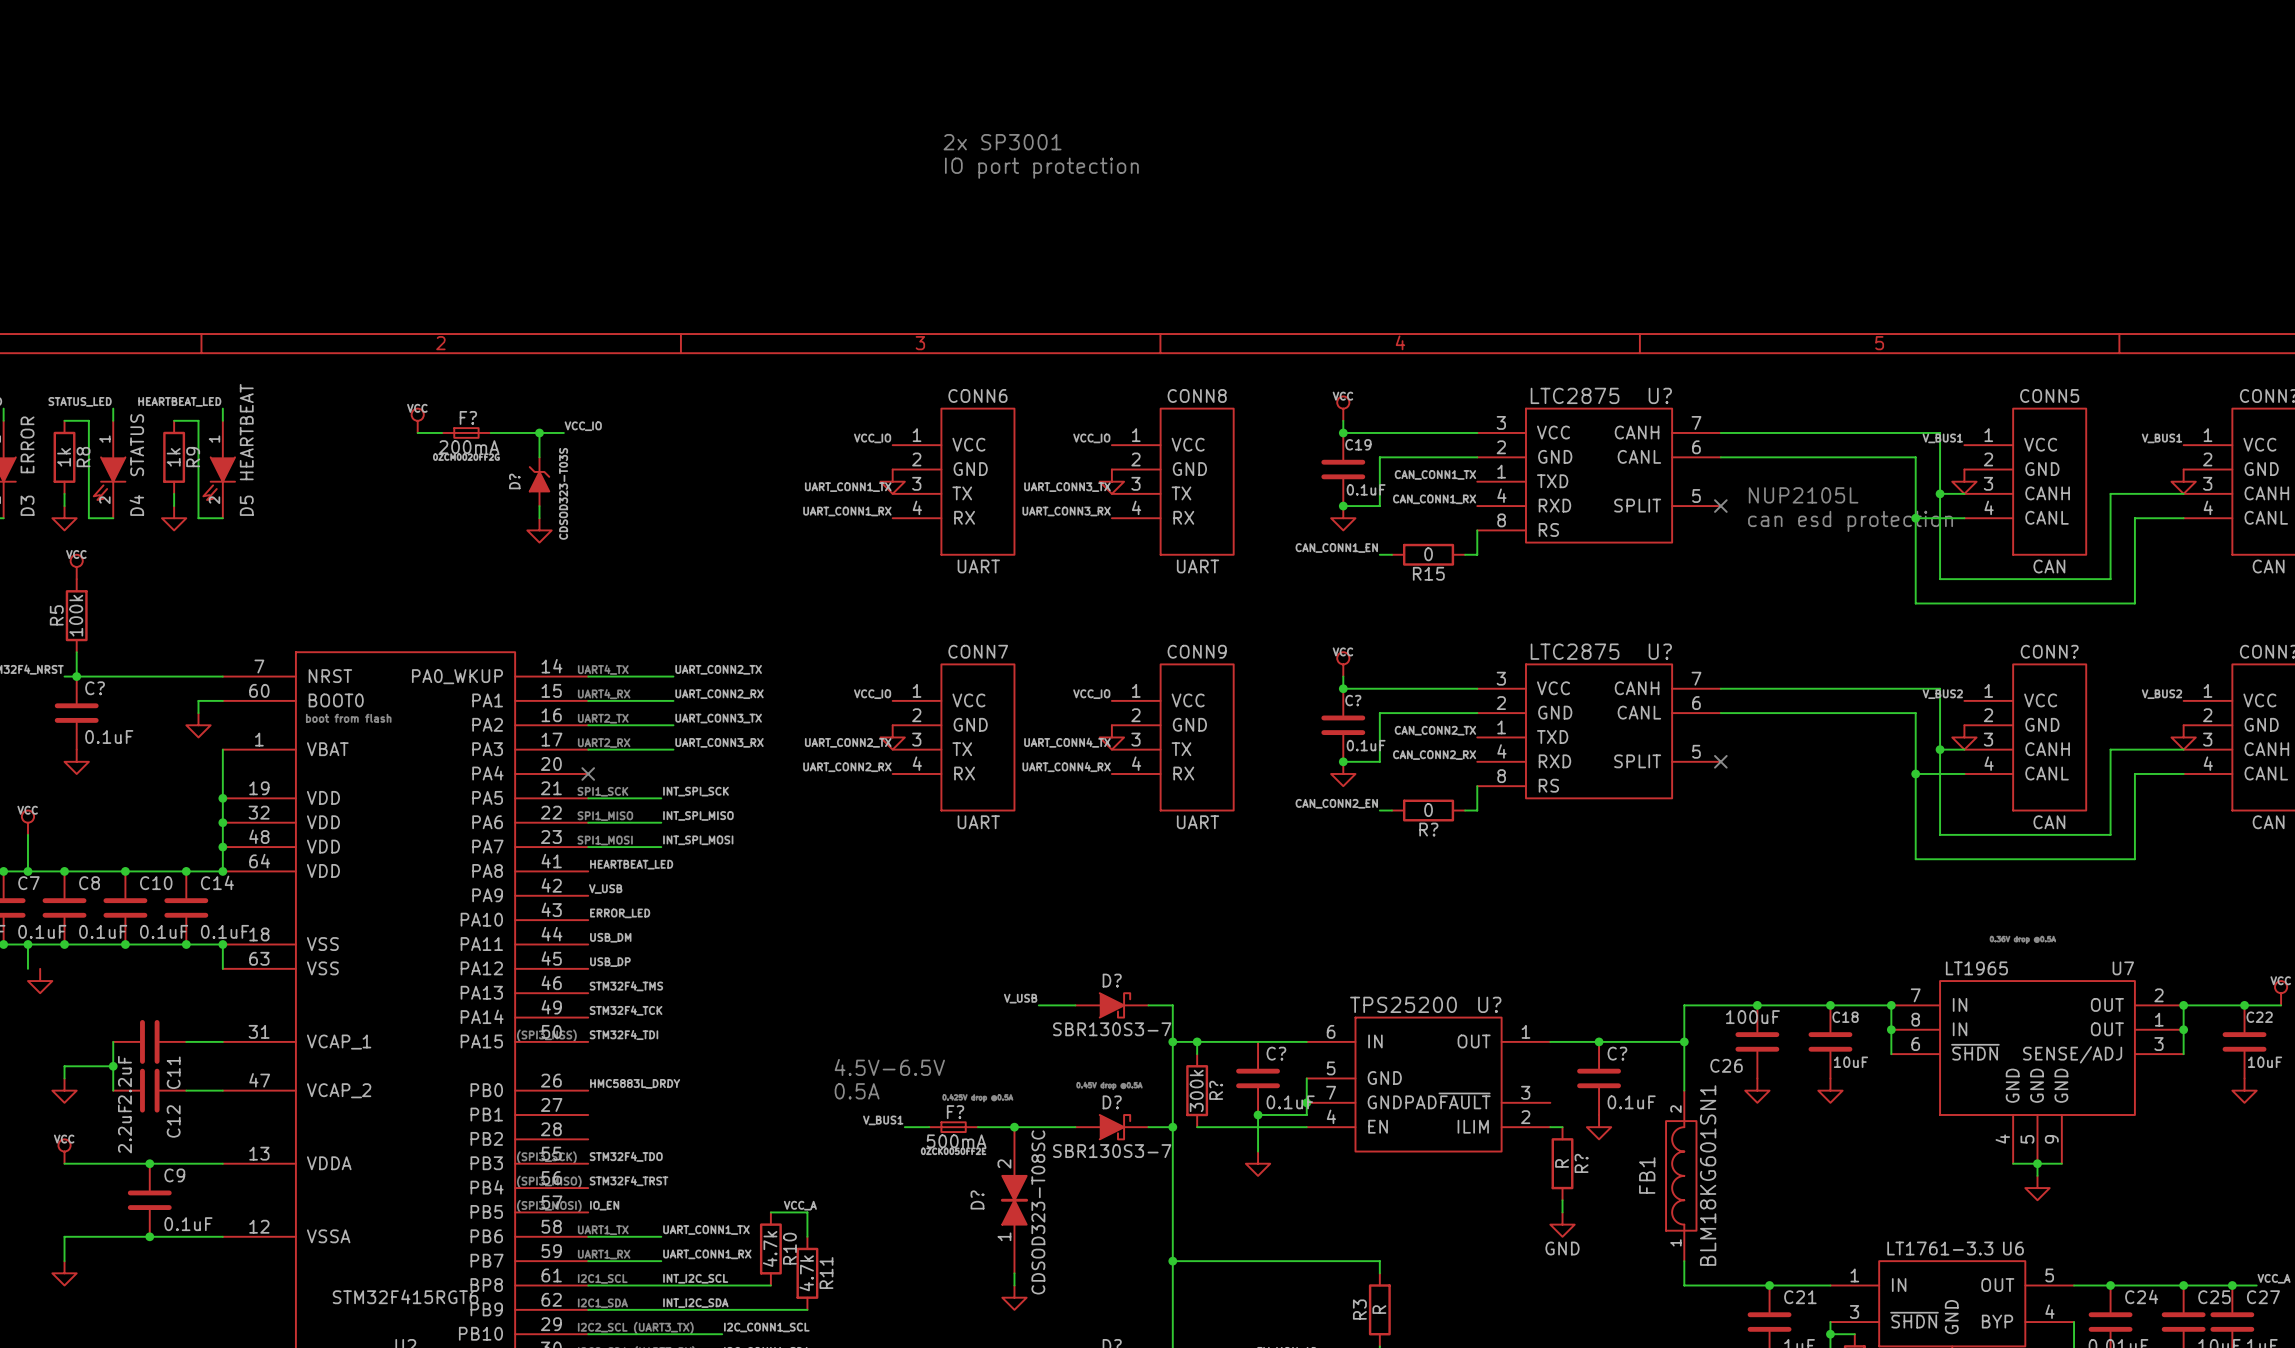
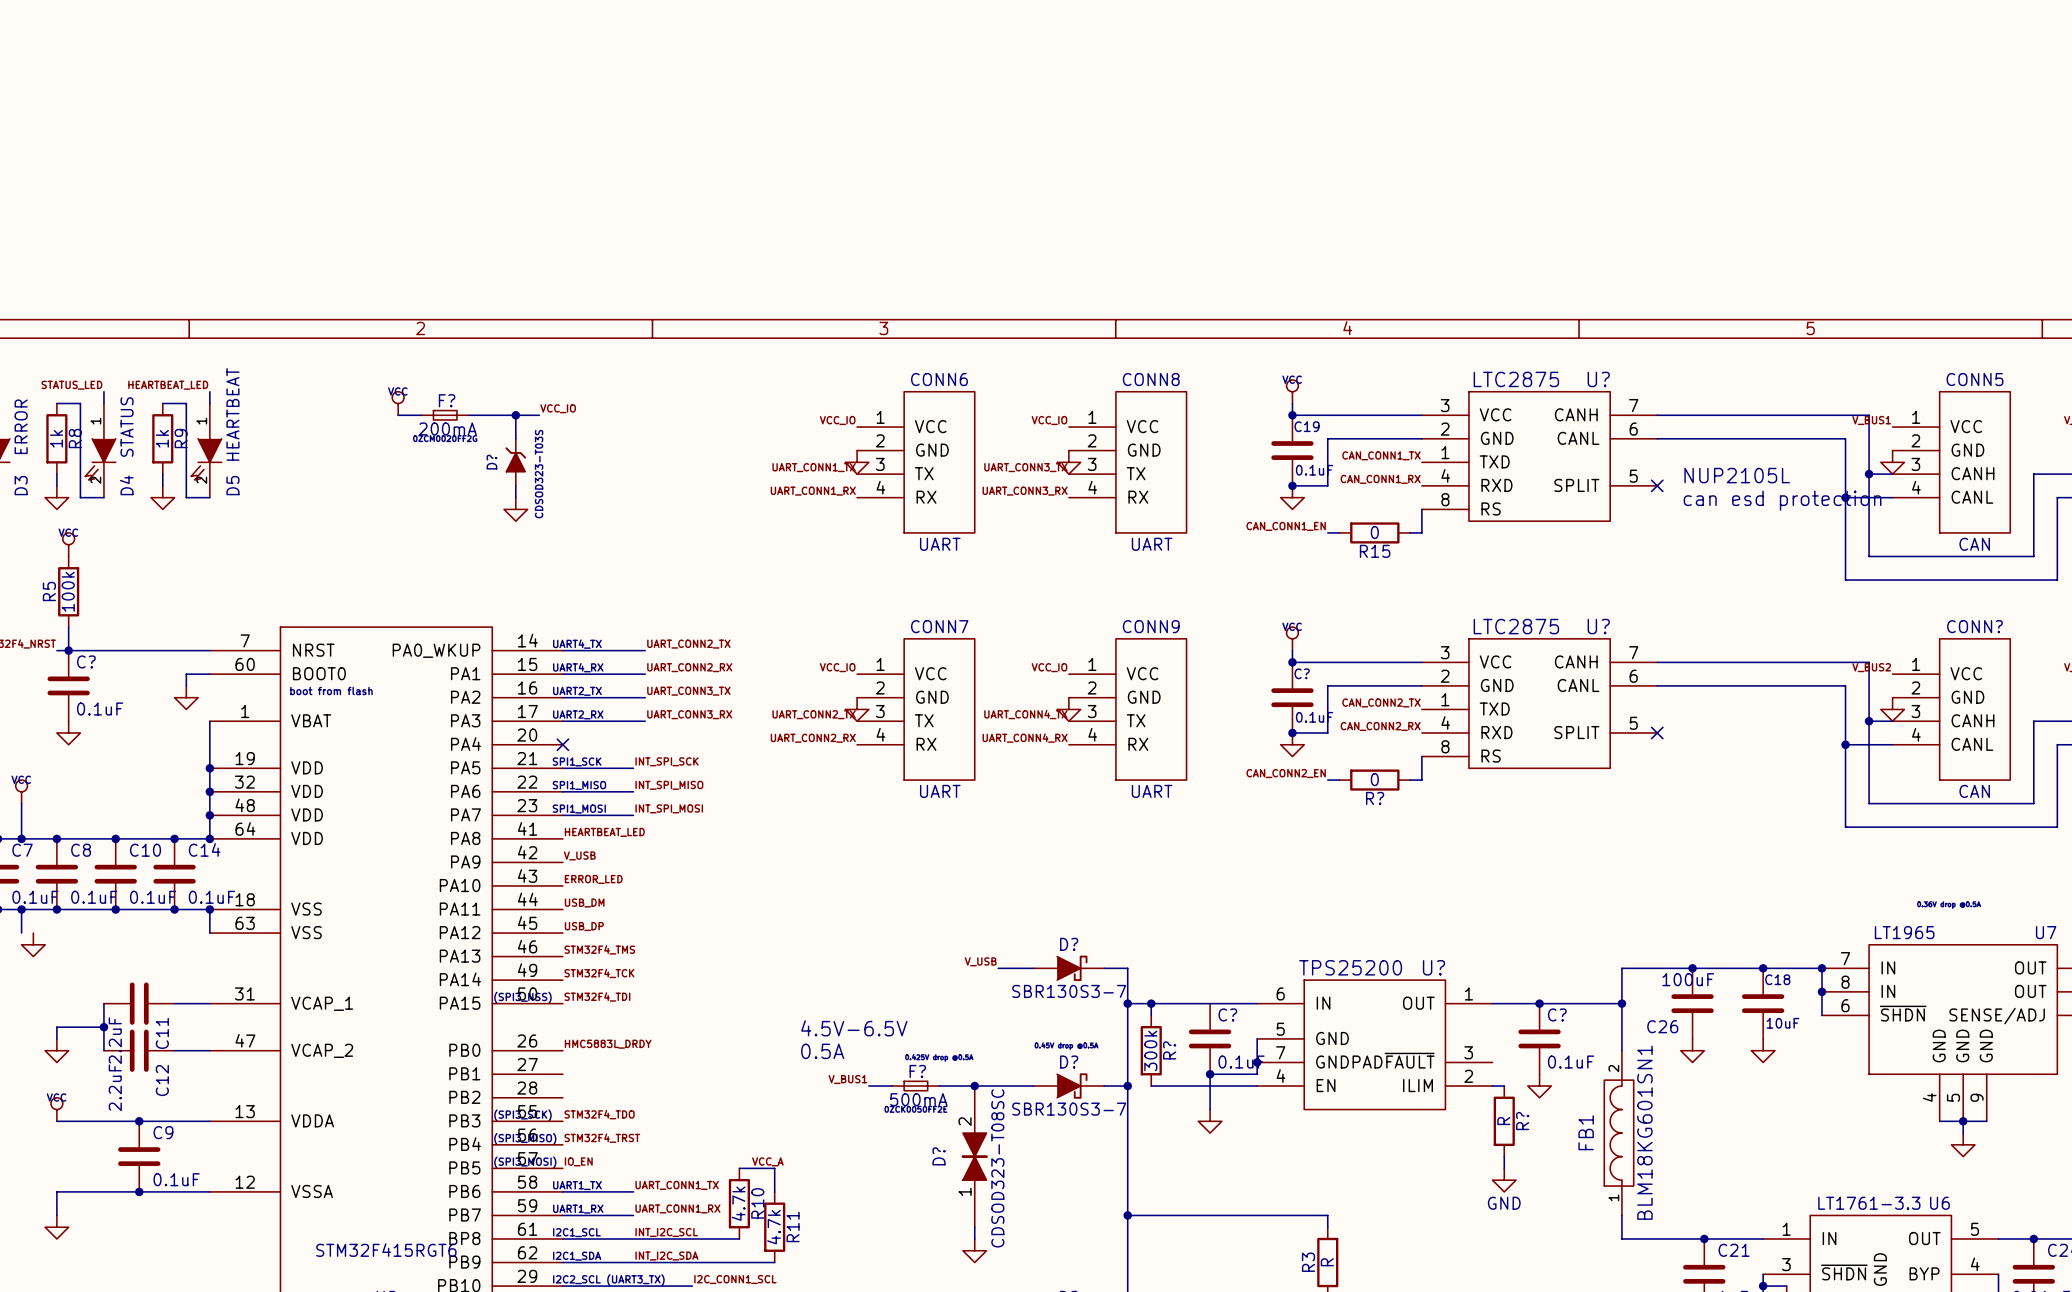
text: 2x SP3001 (1002, 142) -> none
text: IO port protection (1041, 168) -> none

